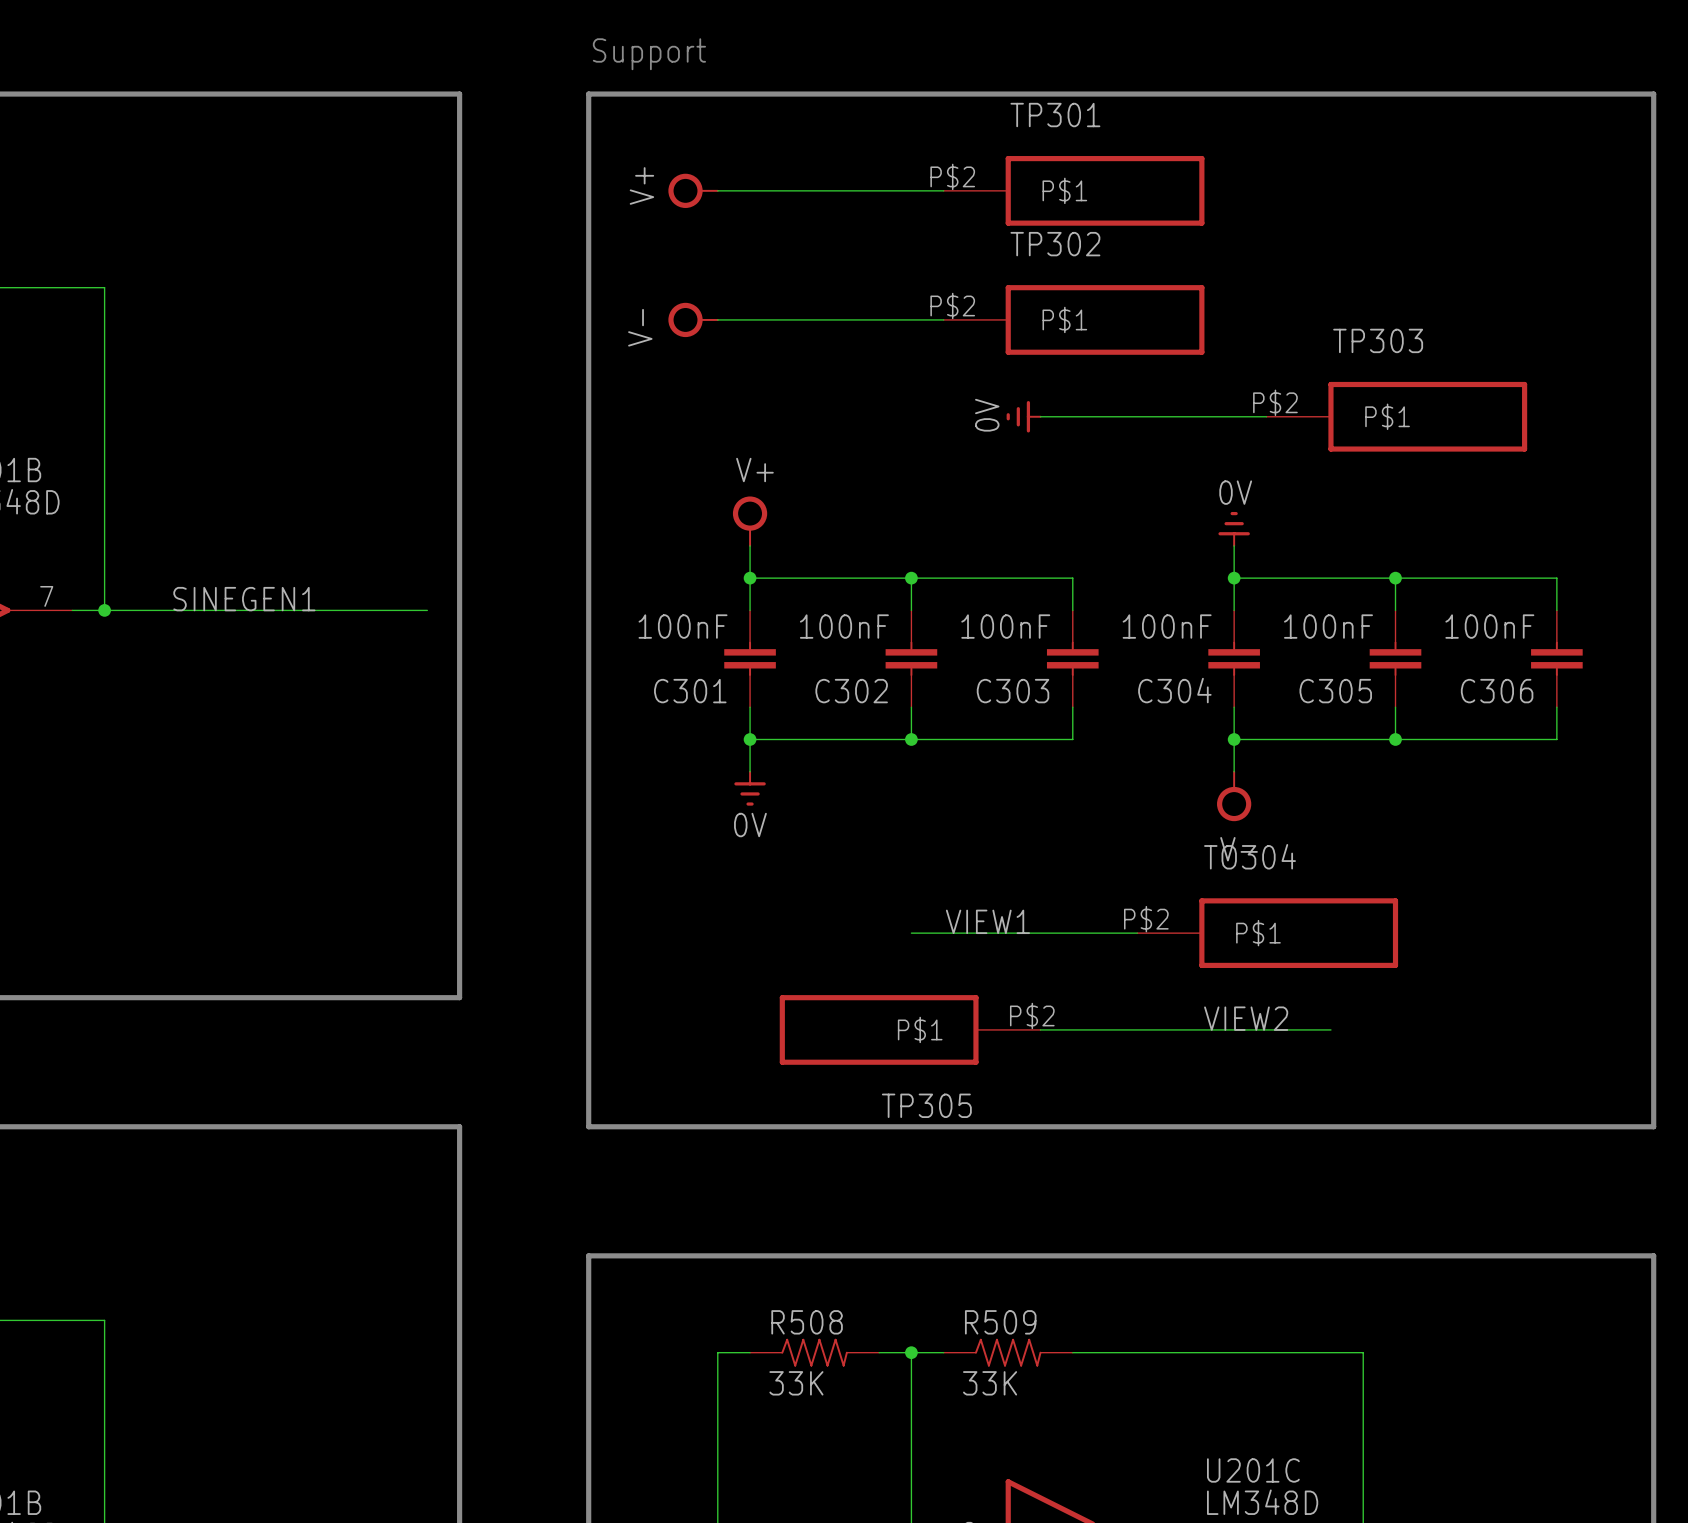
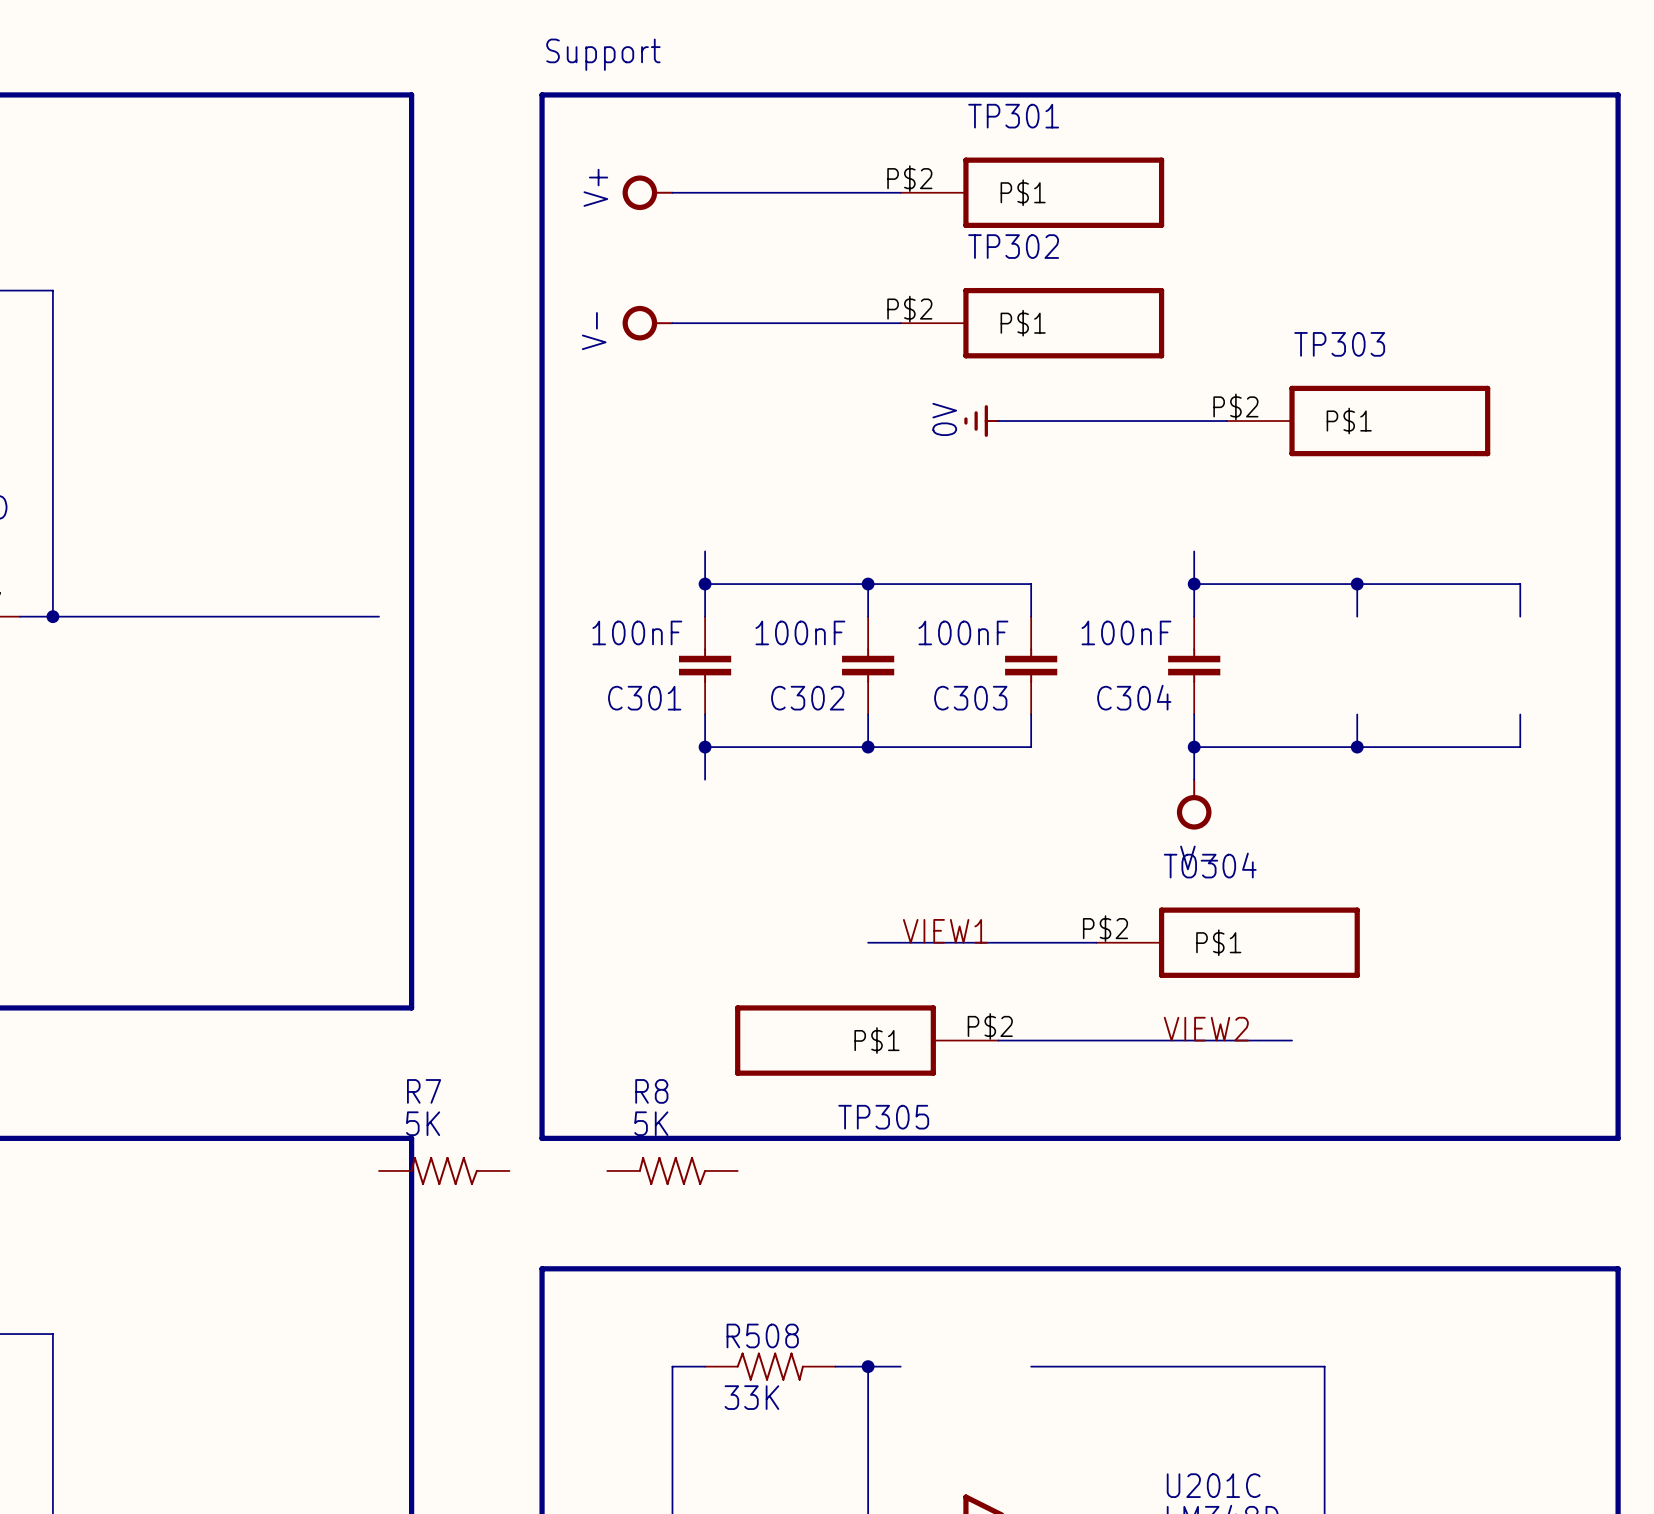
power symbol: V+ (750, 521) -> none
power symbol: 0V (1234, 529) -> none
label: SINEGEN1 (244, 599) -> none
C305: 100nF (1395, 658) -> none
C306: 100nF (1556, 658) -> none
power symbol: 0V (750, 788) -> none
R7: none -> 5K (444, 1170)
R8: none -> 5K (672, 1170)
R509: 33K (1008, 1352) -> none

